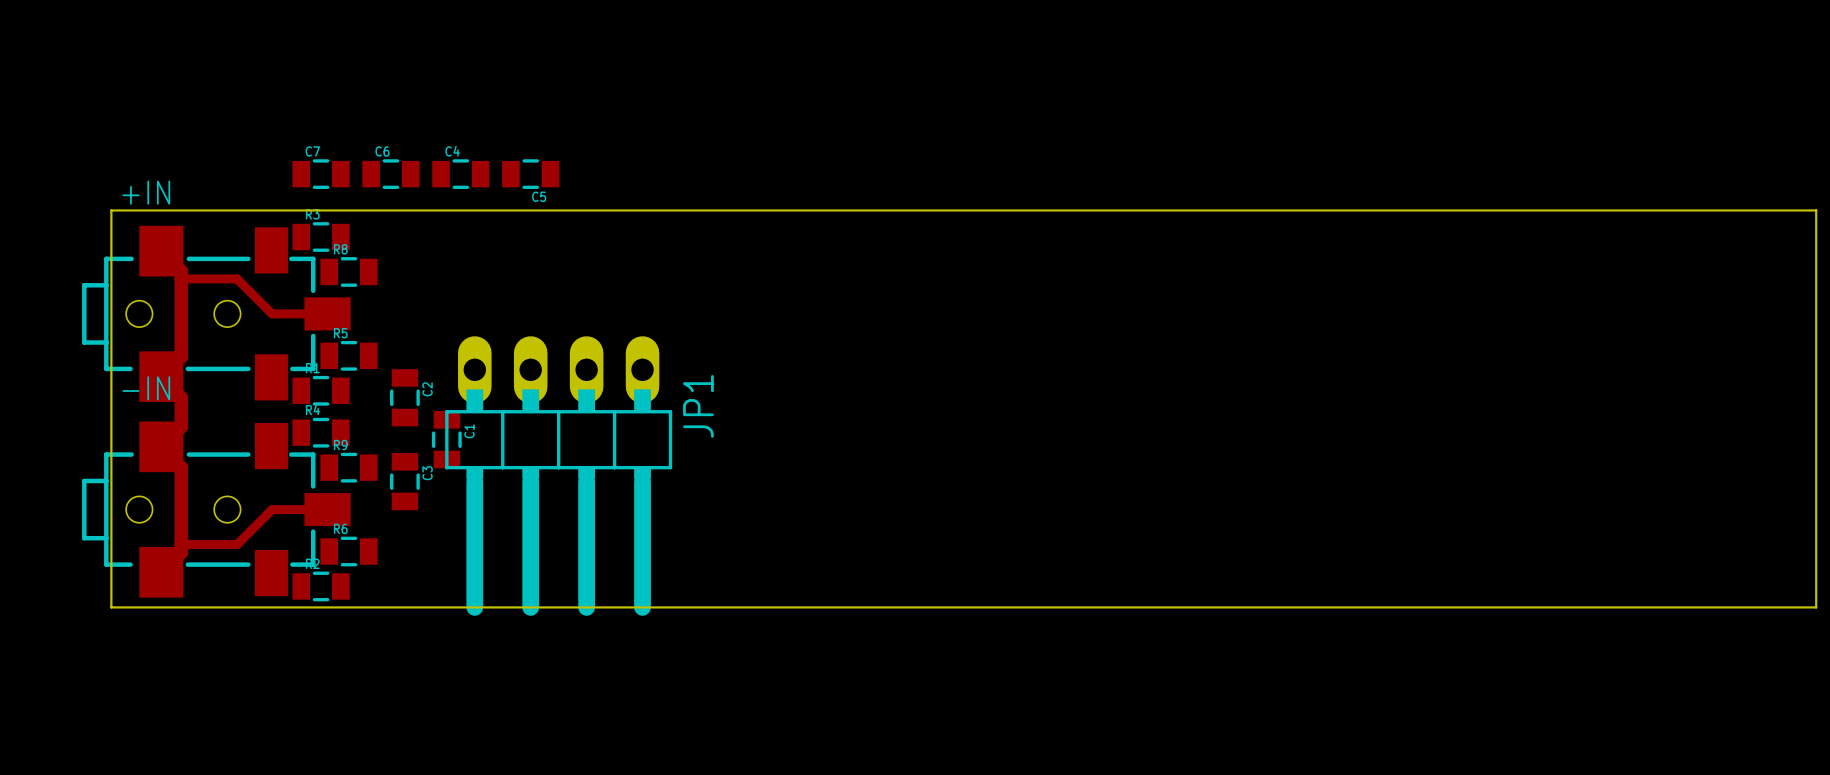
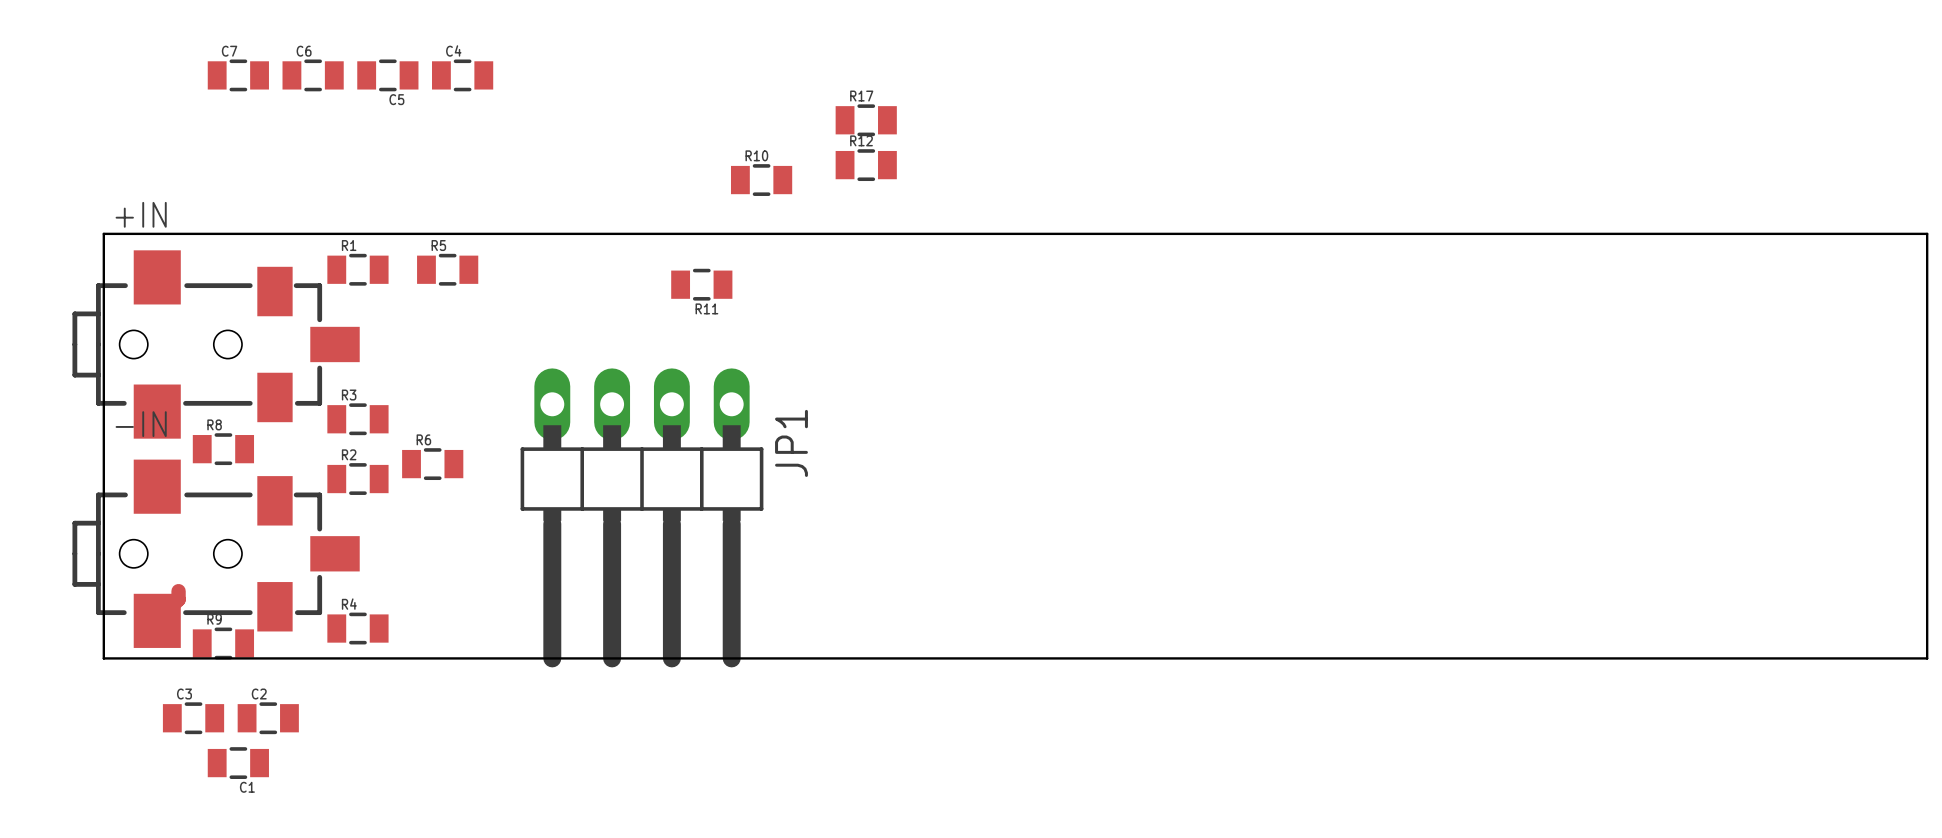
R17: none -> (866, 120)
R12: none -> (866, 165)
R10: none -> (761, 180)
C7 position: (321, 174) -> (238, 75)
C6 position: (390, 174) -> (313, 75)
C4 position: (460, 174) -> (462, 75)
C5 position: (530, 174) -> (387, 75)
+IN footprint: [82, 225, 351, 402] -> [72, 250, 360, 439]
R3 position: (321, 237) -> (357, 419)
track: (161, 252) (181, 271) (181, 356) (161, 376) (181, 397) (181, 426) (161, 446) (181, 467) (181, 544) (237, 544) (272, 509) (327, 509) -> none
R11: none -> (701, 284)
R8 position: (349, 271) -> (223, 449)
track: (181, 278) (237, 278) (272, 313) (327, 313) -> none
R5 position: (349, 355) -> (447, 269)
R1 position: (321, 390) -> (357, 269)
C2 rotation: 0° (404, 397) -> 90° clockwise (268, 718)
C2 position: (404, 397) -> (268, 718)
-IN footprint: [82, 421, 351, 598] -> [72, 459, 360, 648]
R4 position: (321, 432) -> (357, 628)
C1 rotation: 0° (446, 439) -> 90° clockwise (238, 763)
C1 position: (446, 439) -> (238, 763)
R9 position: (349, 467) -> (223, 643)
JP1 position: (558, 476) -> (642, 517)
C3 rotation: 0° (404, 481) -> 90° clockwise (193, 718)
C3 position: (404, 481) -> (193, 718)
R6 position: (349, 551) -> (432, 464)
R2 position: (321, 586) -> (357, 479)

